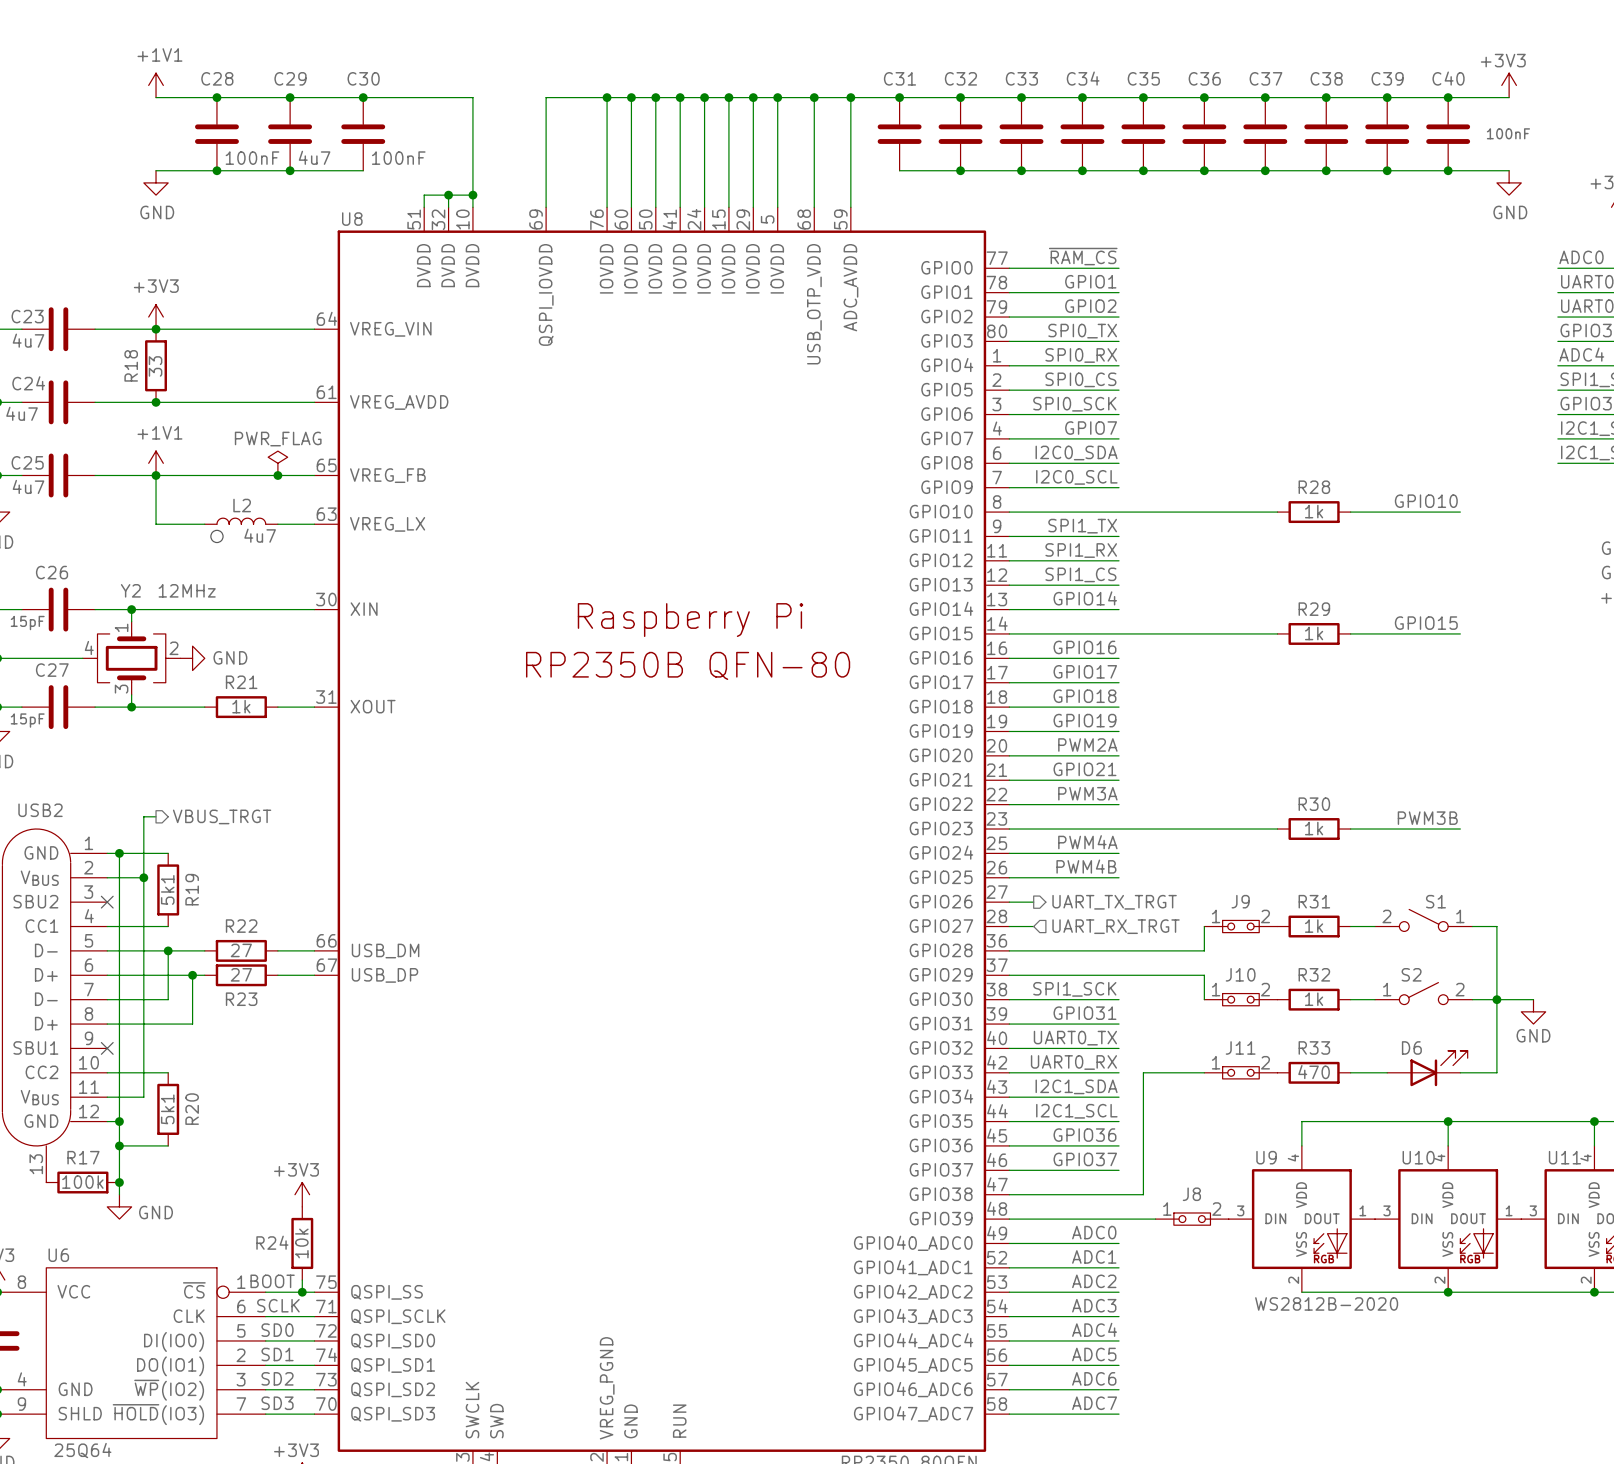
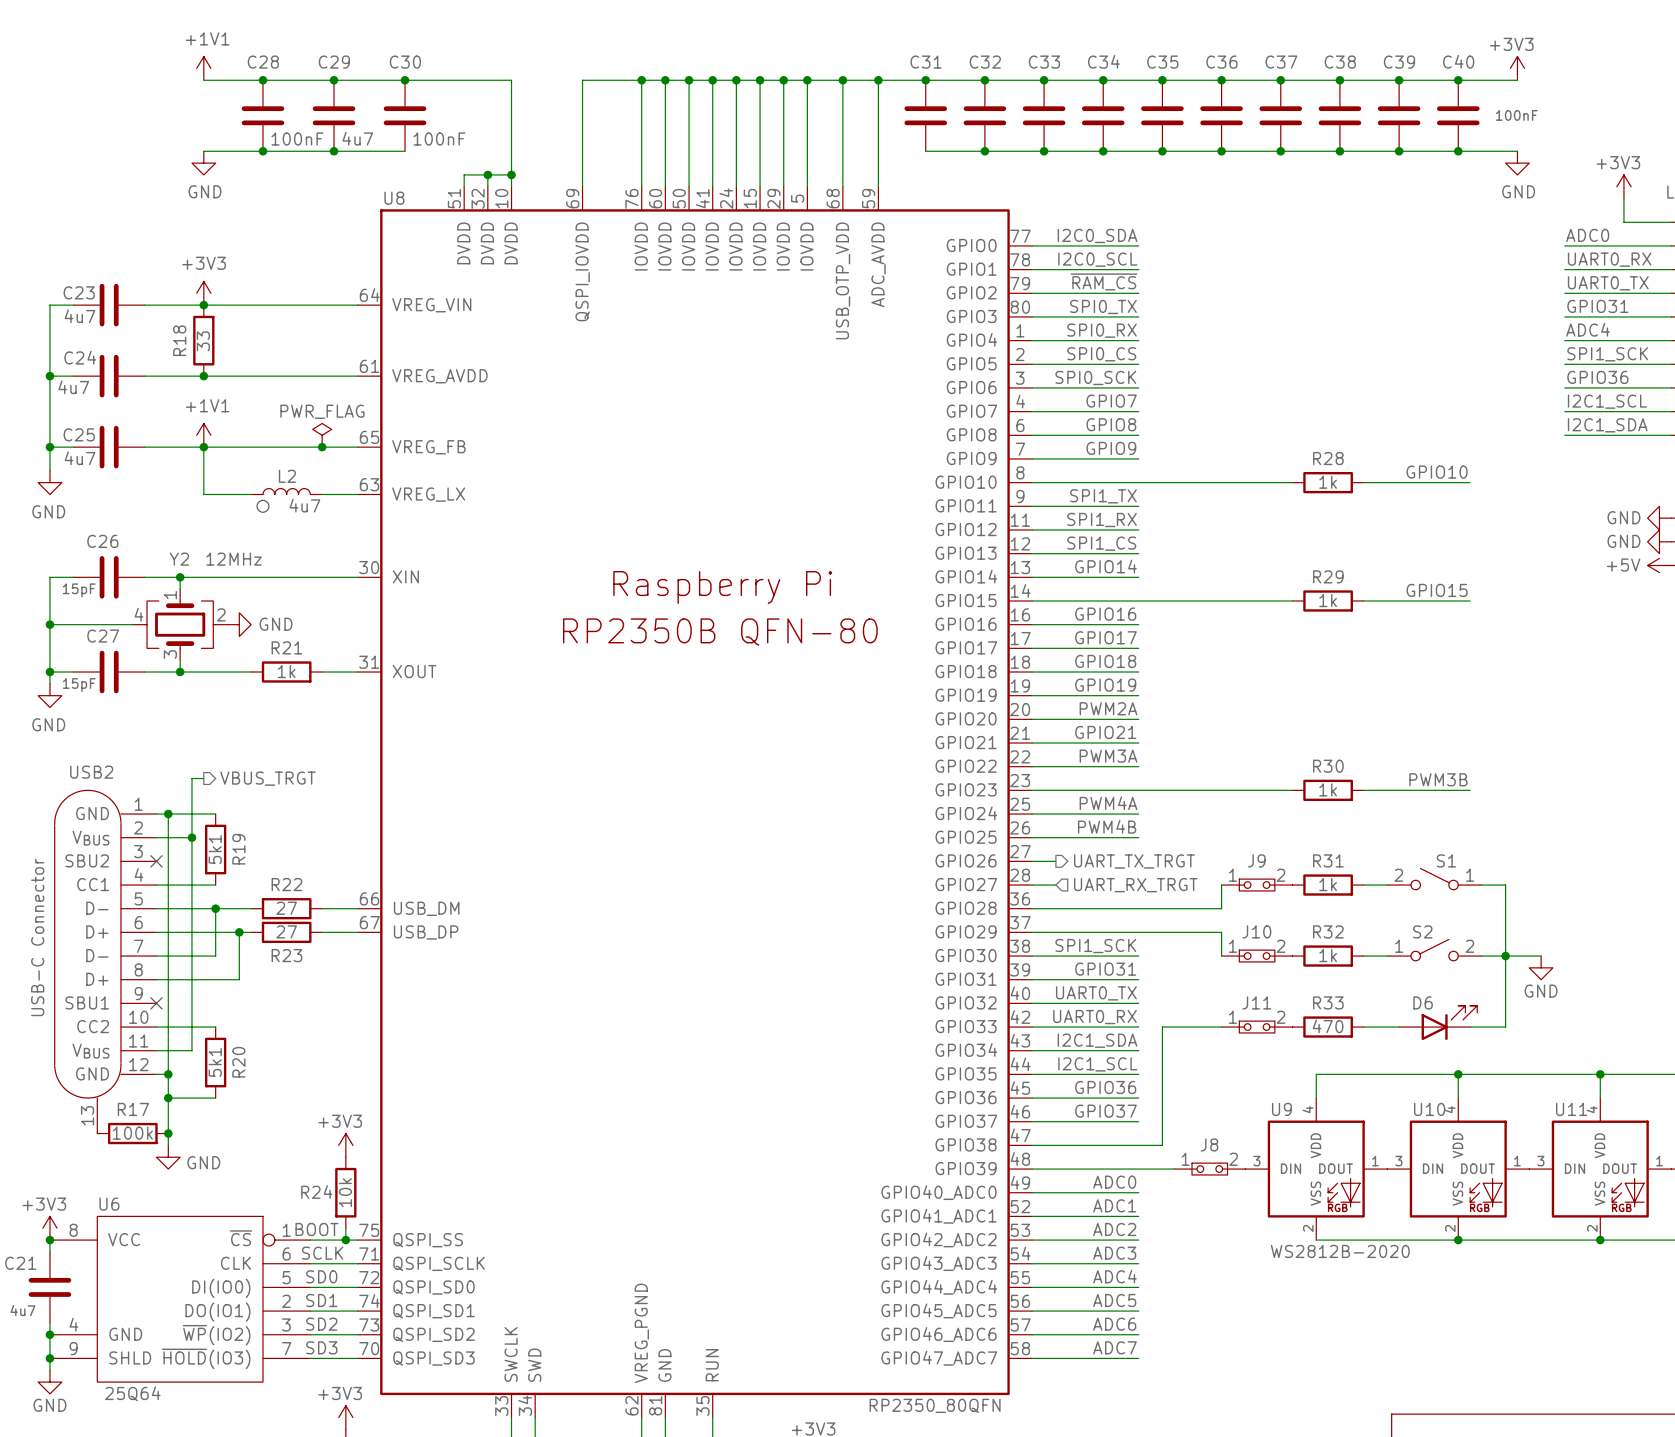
label: ~{RAM_CS} (1083, 256) -> I2C0_SDA (1097, 235)
label: GPIO1 (1090, 281) -> I2C0_SCL (1097, 259)
label: GPIO2 (1090, 306) -> ~{RAM_CS} (1104, 281)
label: I2C0_SDA (1076, 453) -> GPIO8 (1111, 424)
label: I2C0_SCL (1076, 477) -> GPIO9 (1111, 448)

